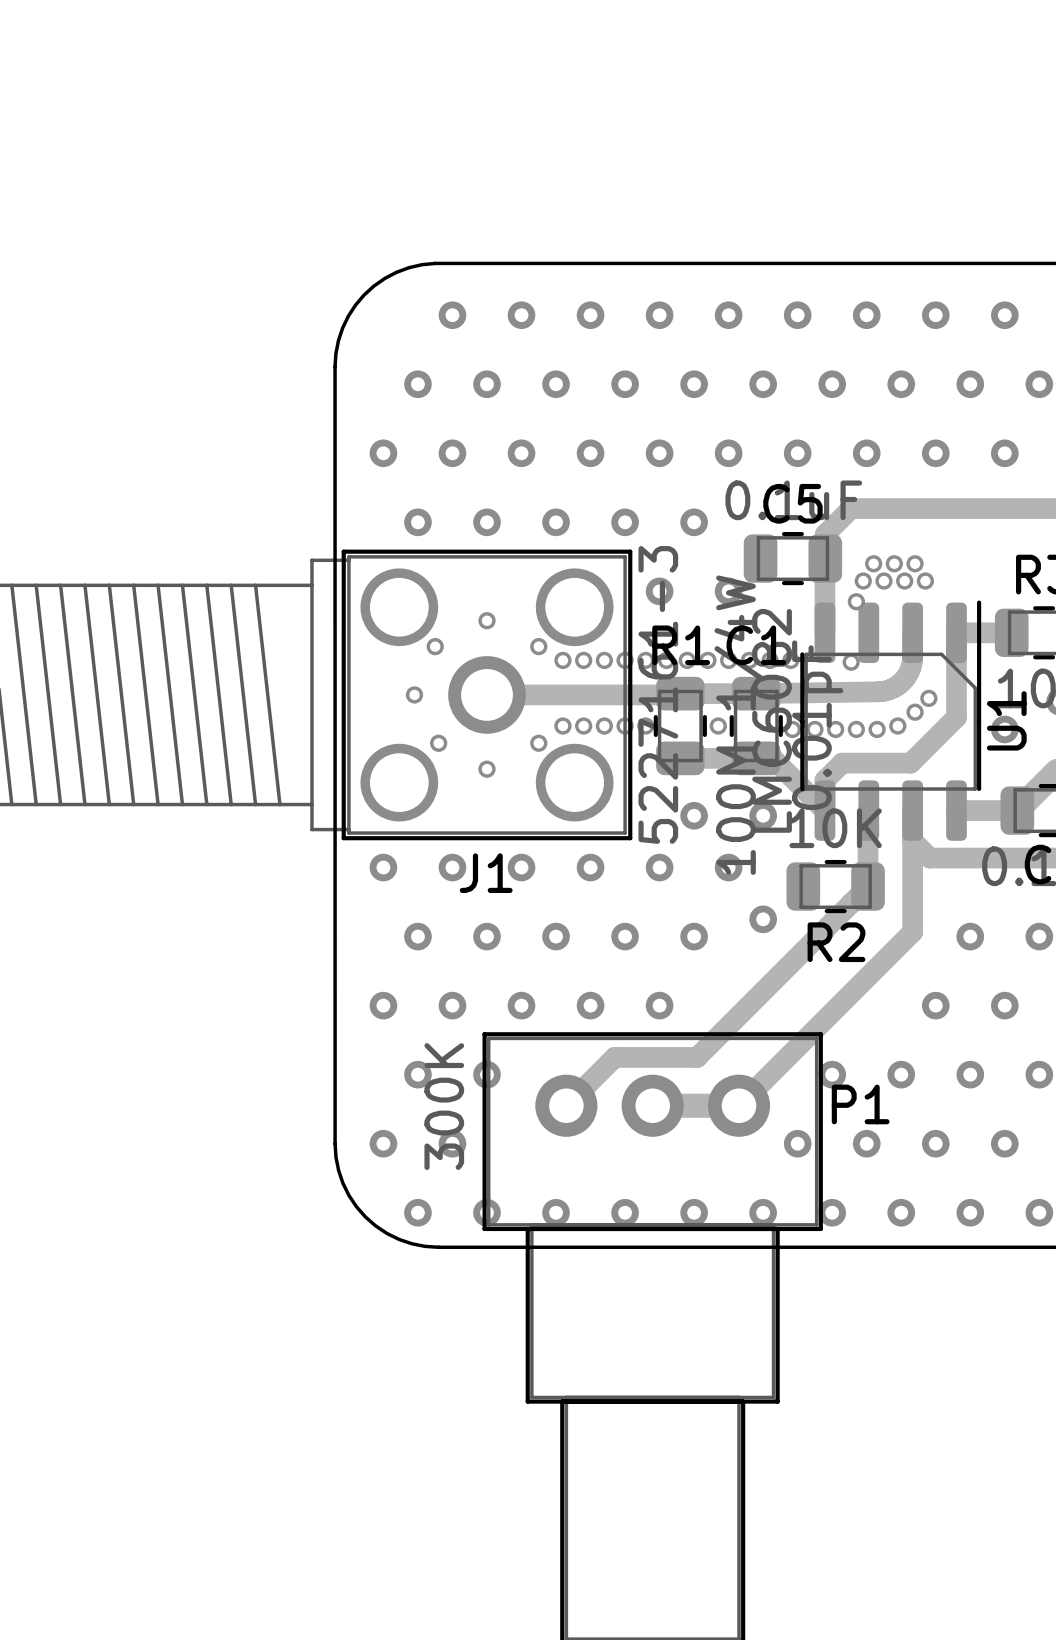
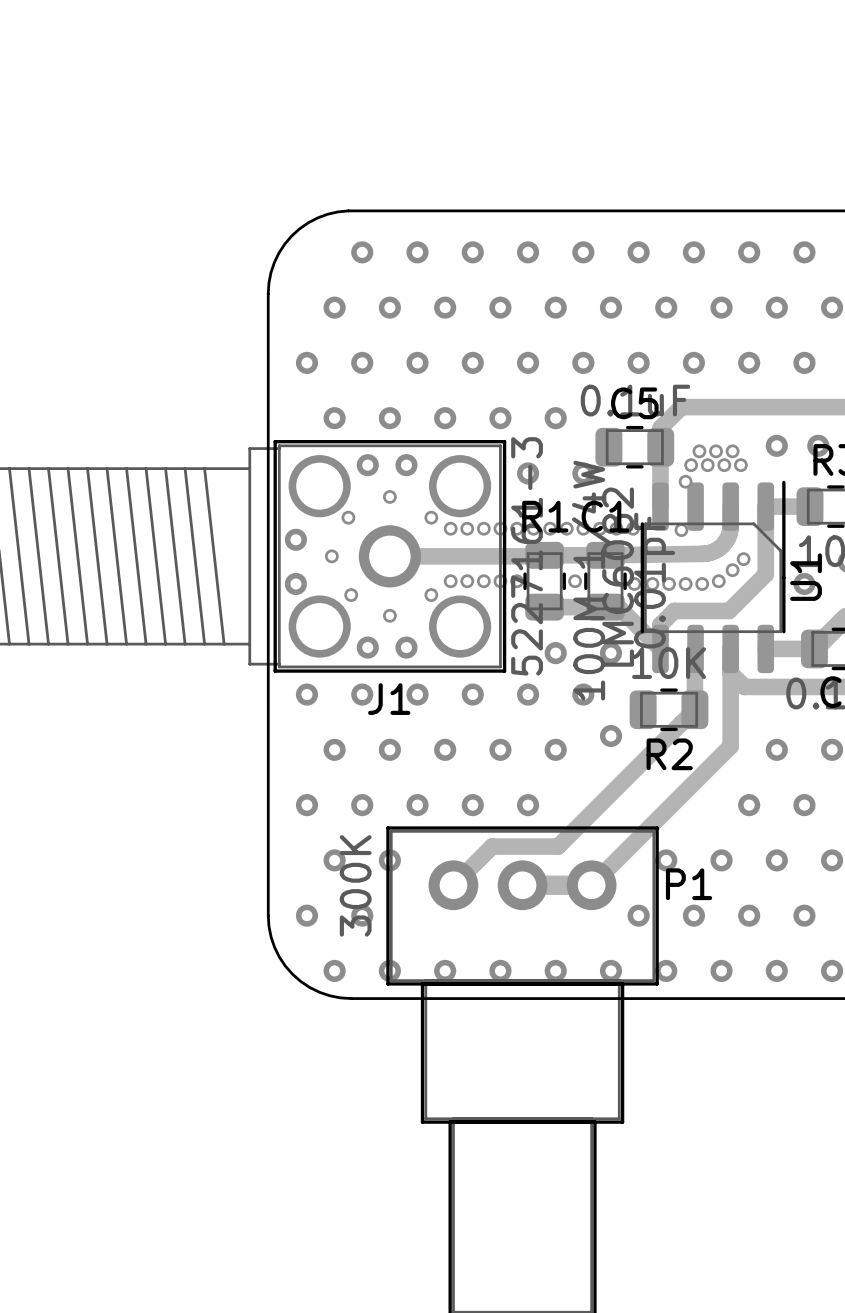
via: none -> (776, 445)
via: none -> (818, 445)
via: none -> (367, 465)
via: none -> (406, 465)
via: none -> (295, 539)
via: none -> (295, 584)
via: none -> (367, 647)
via: none -> (406, 647)

